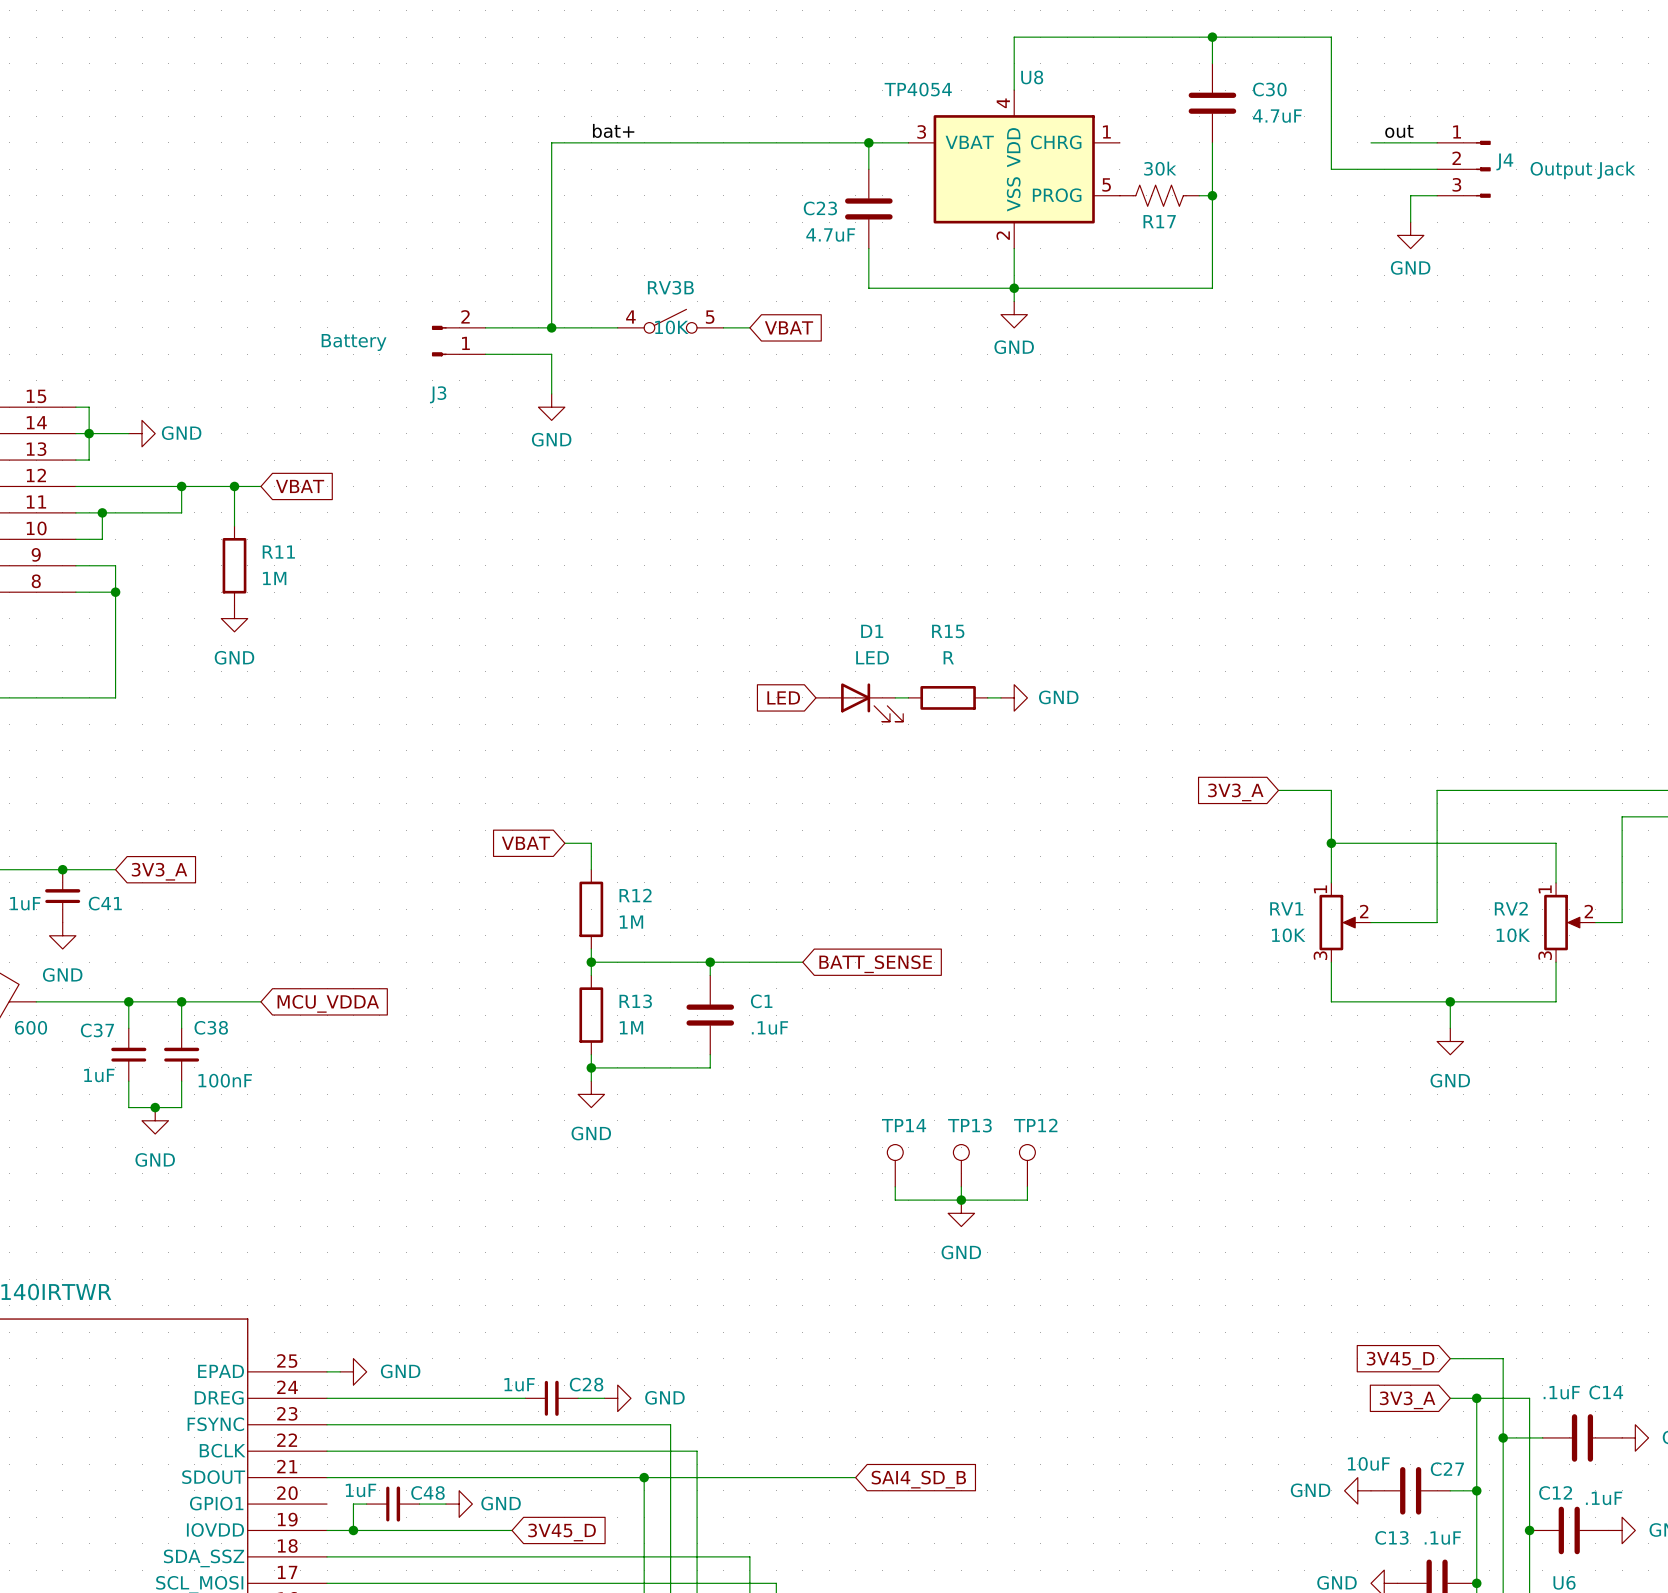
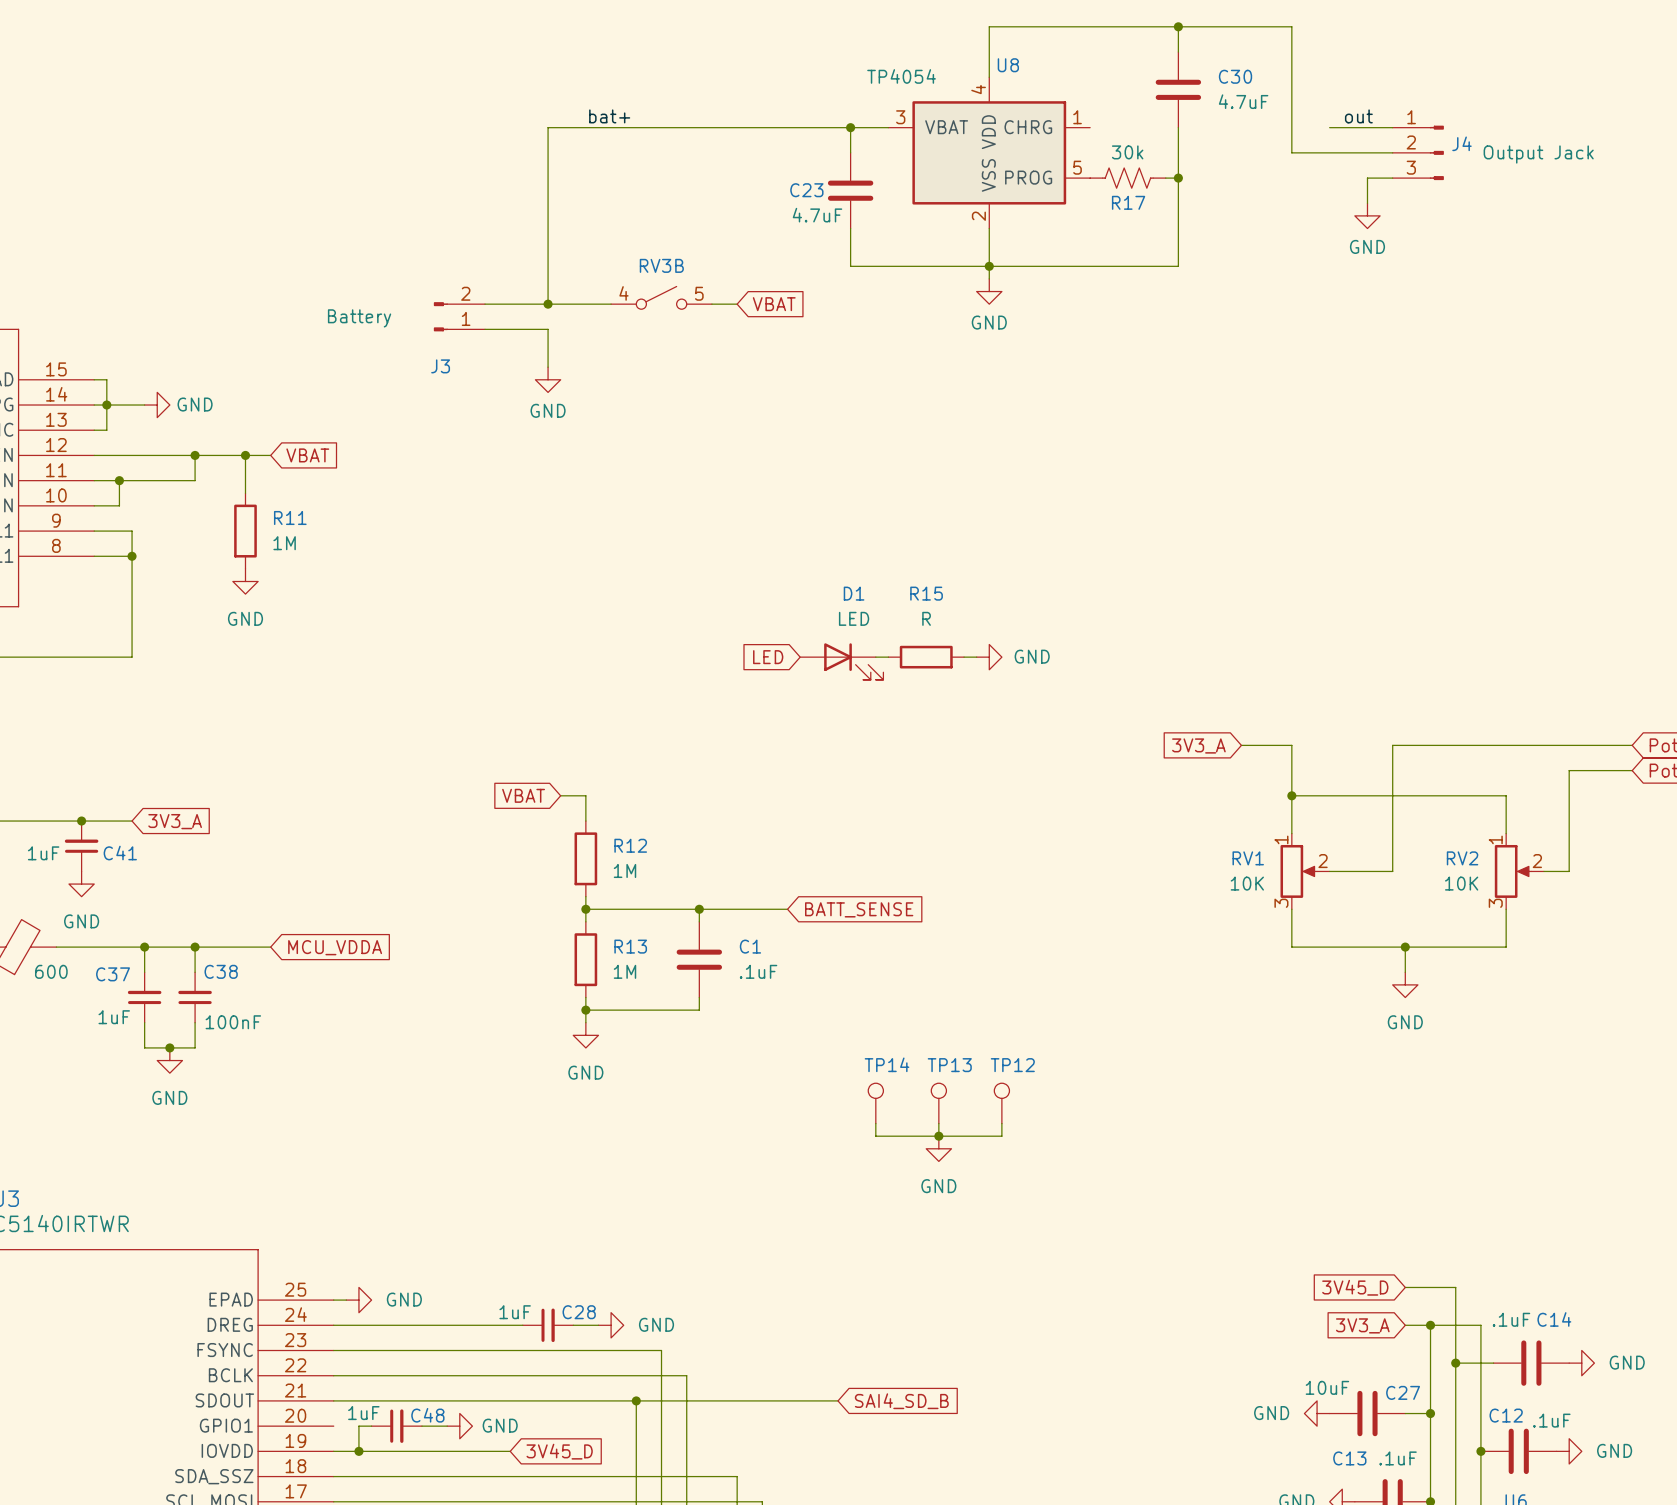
RV3B value: 10K (671, 327) -> none

